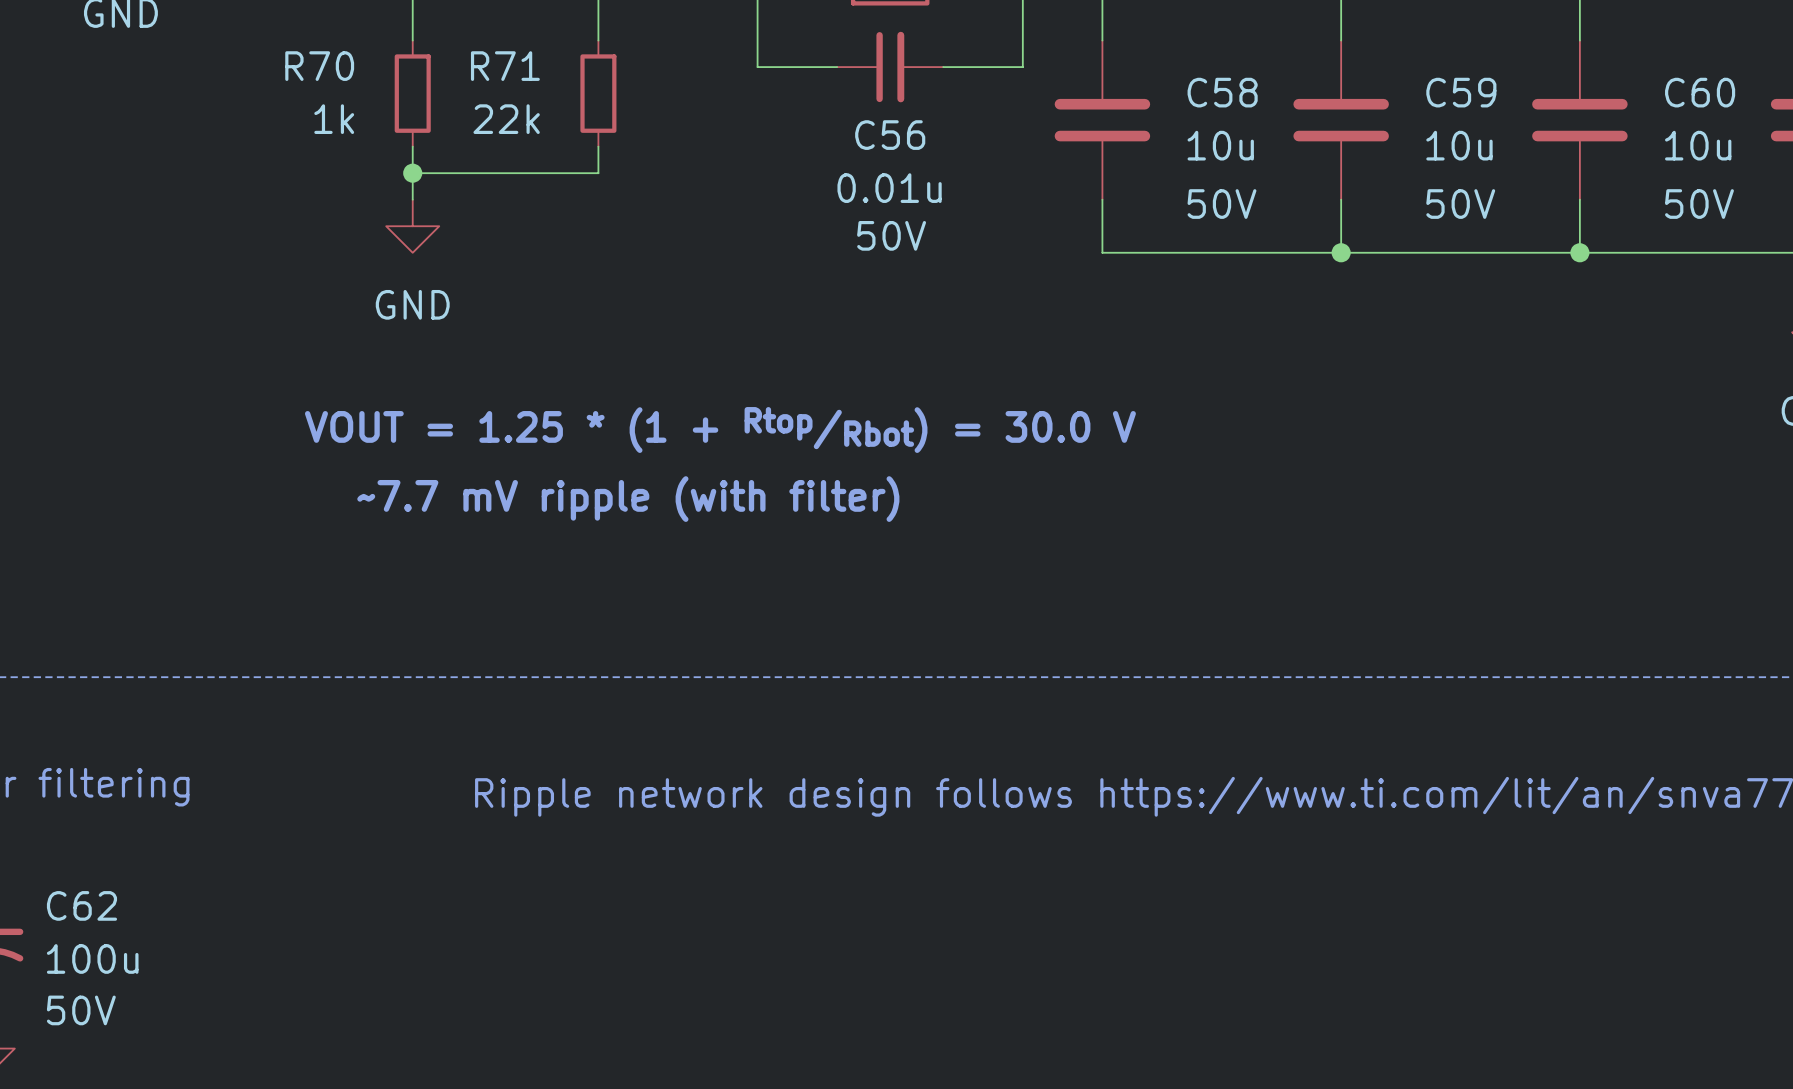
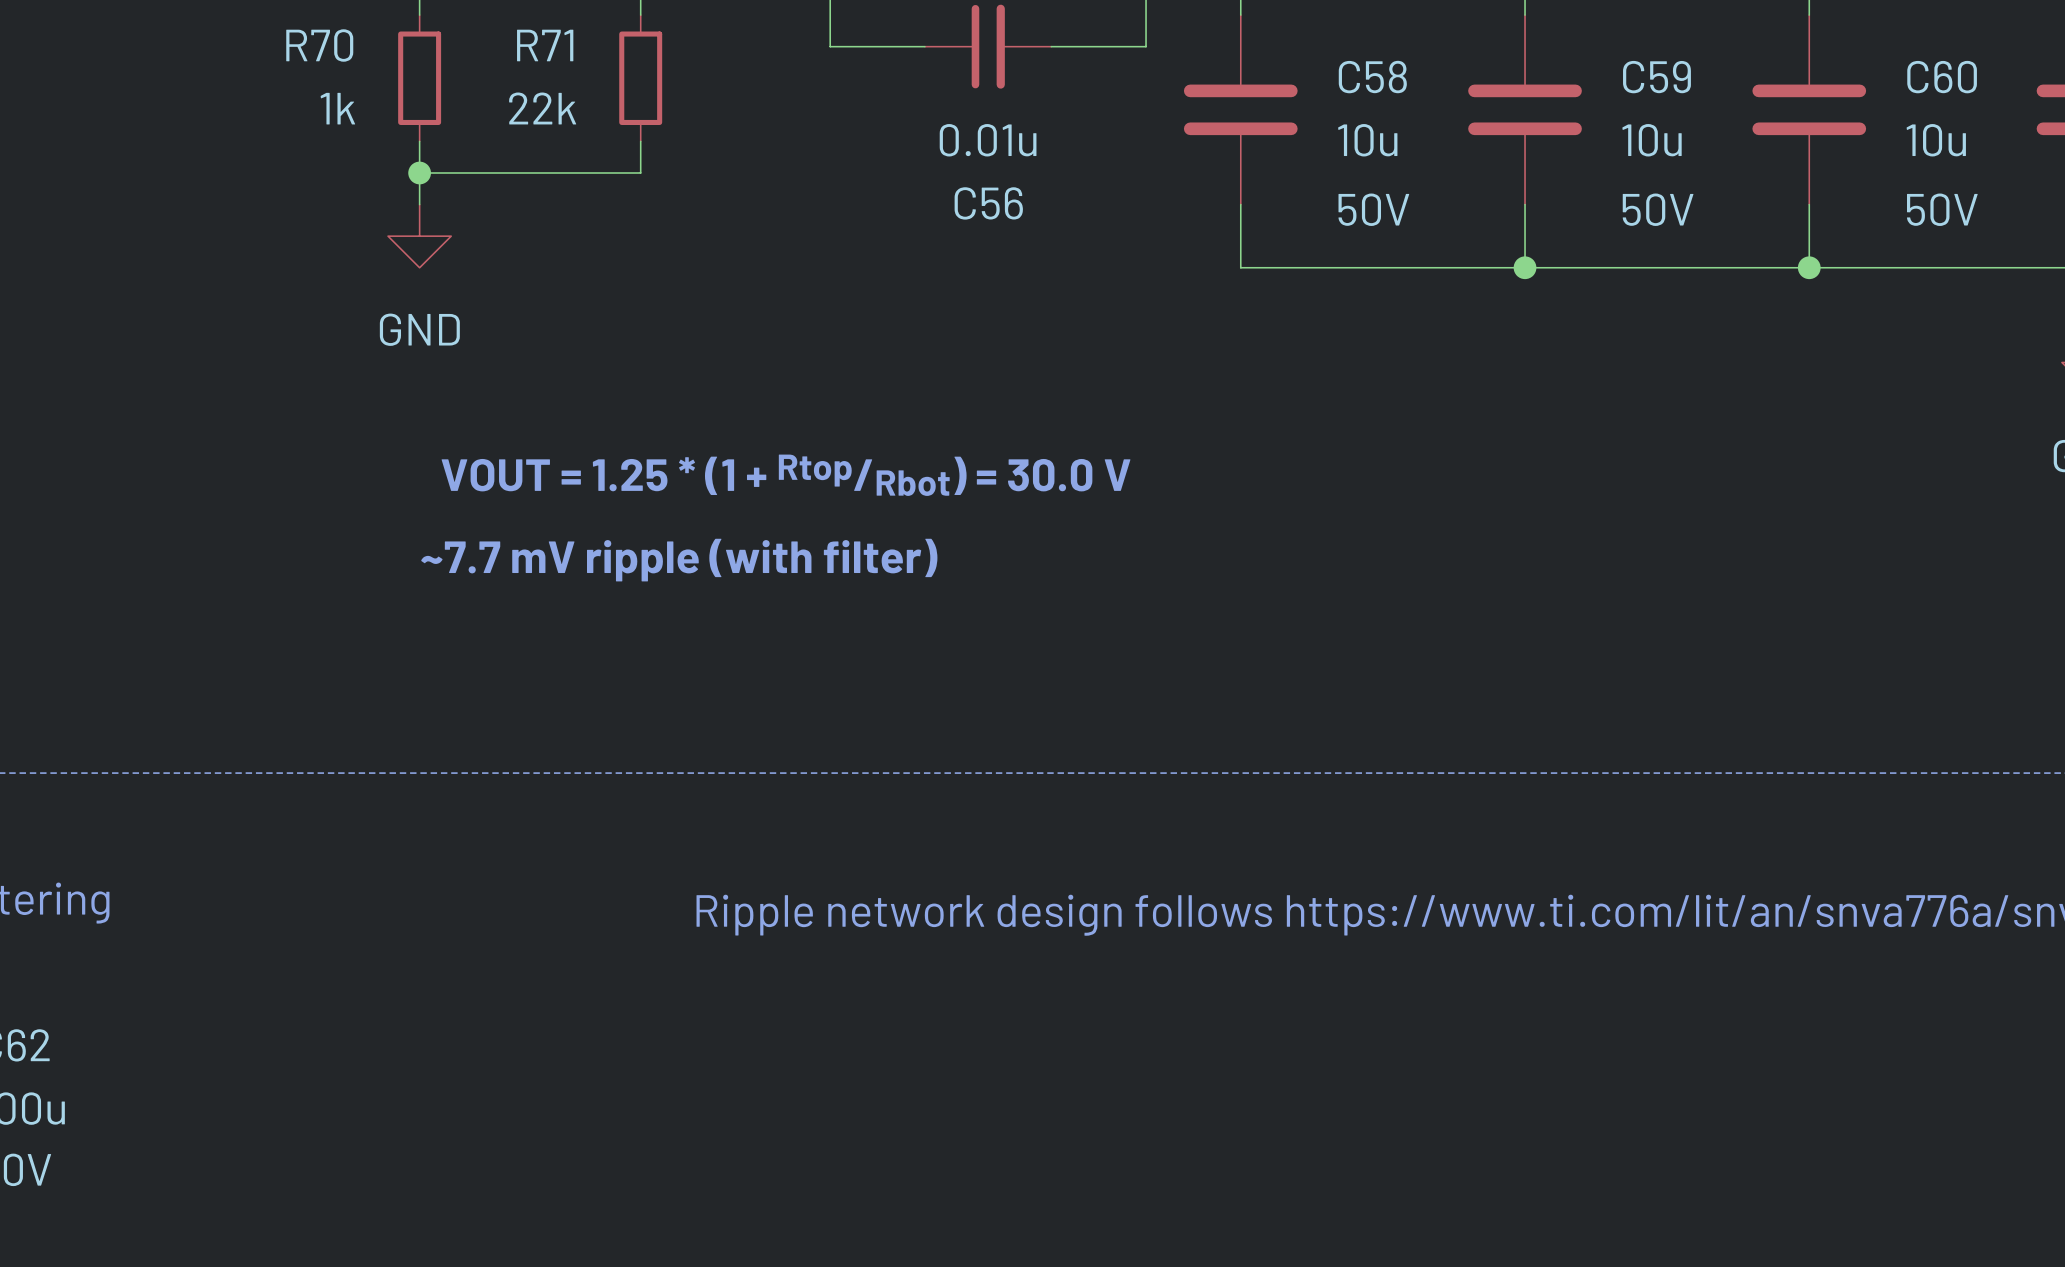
C56 name position: C56 (890, 135) -> C56 (988, 203)
C56 value position: 0.01u (889, 188) -> 0.01u (988, 140)
C56 text: 50V (891, 235) -> none

